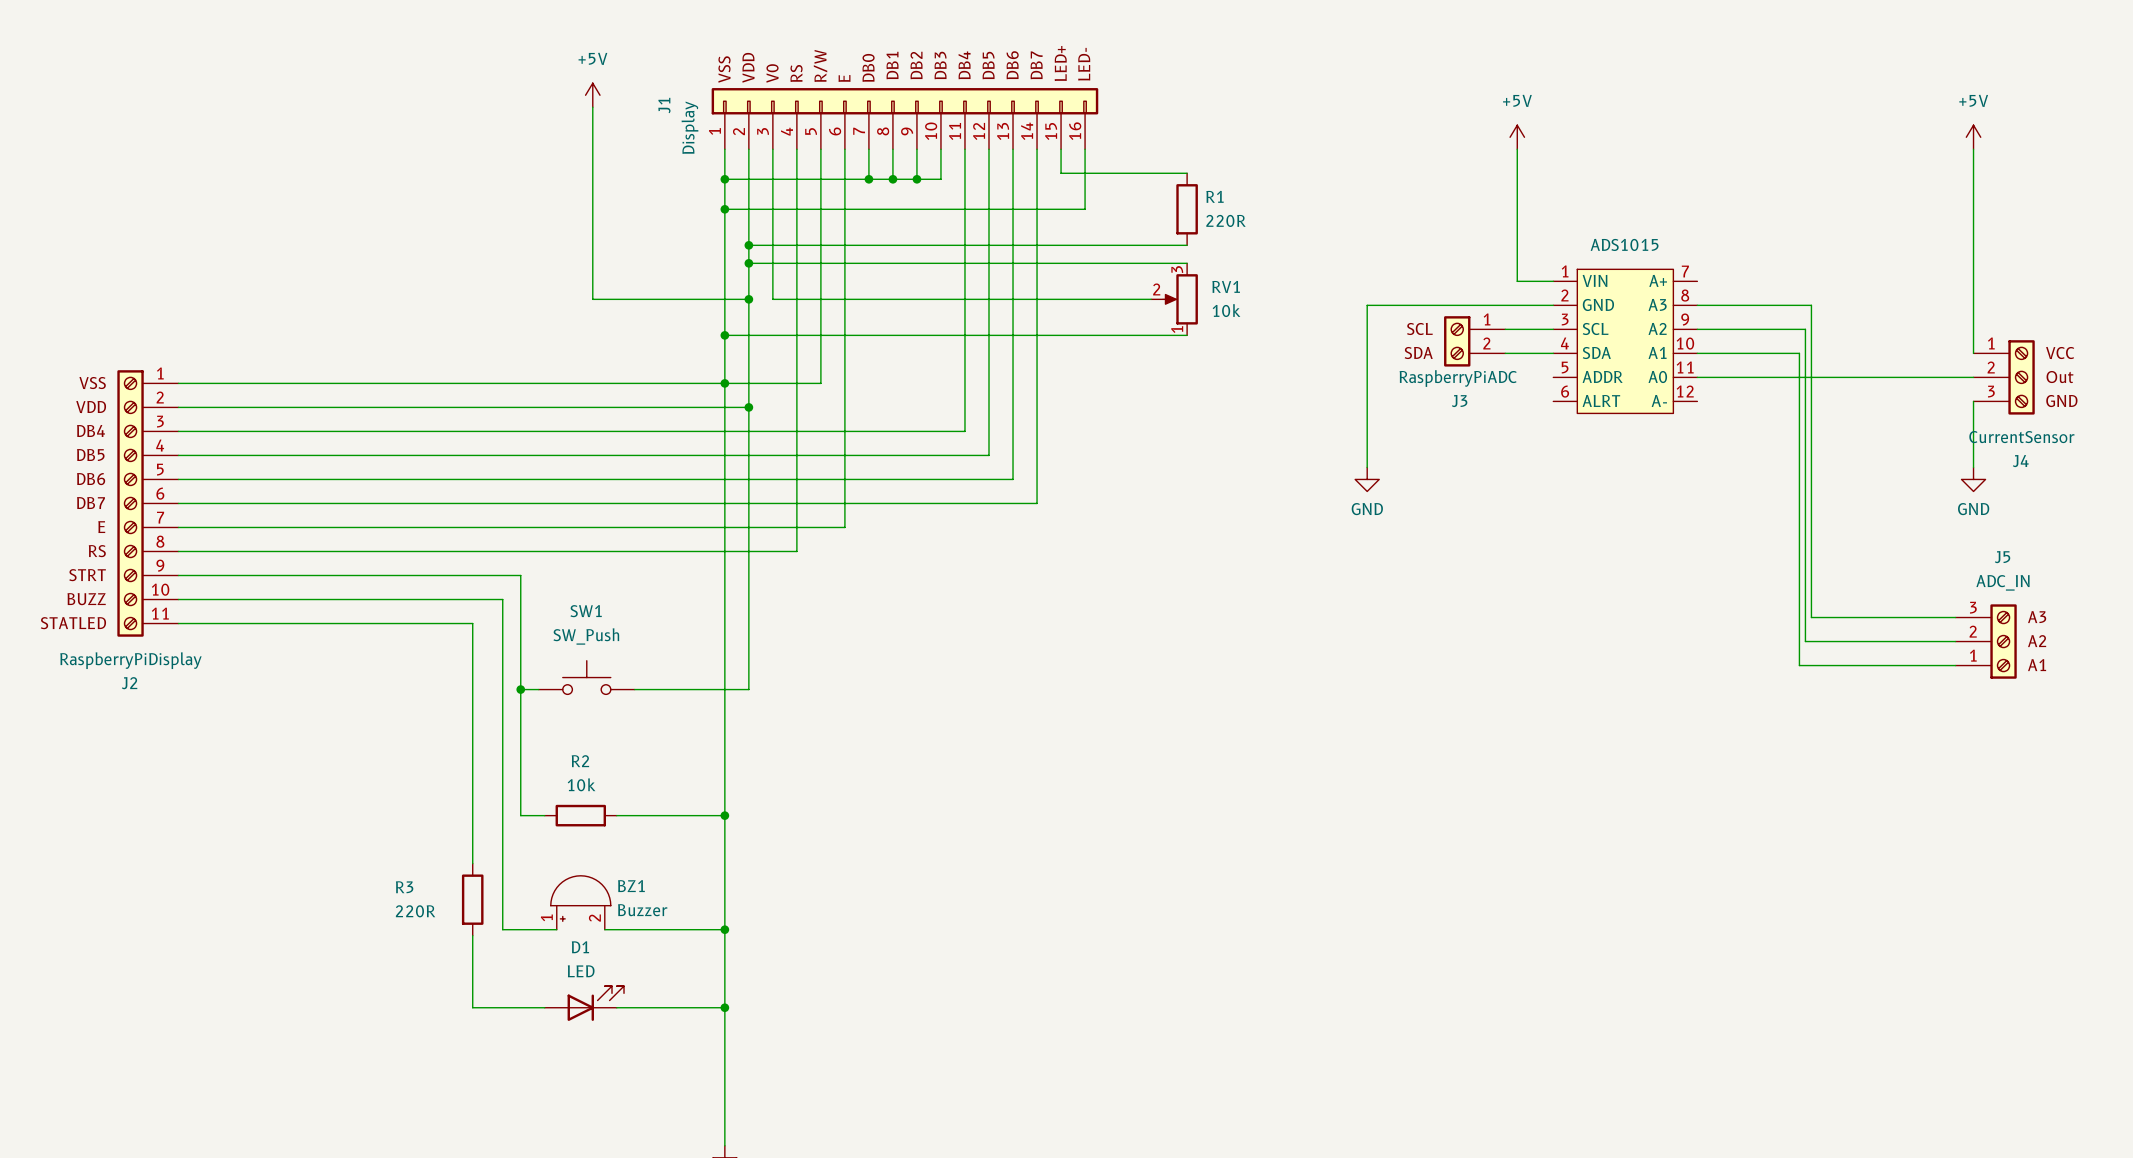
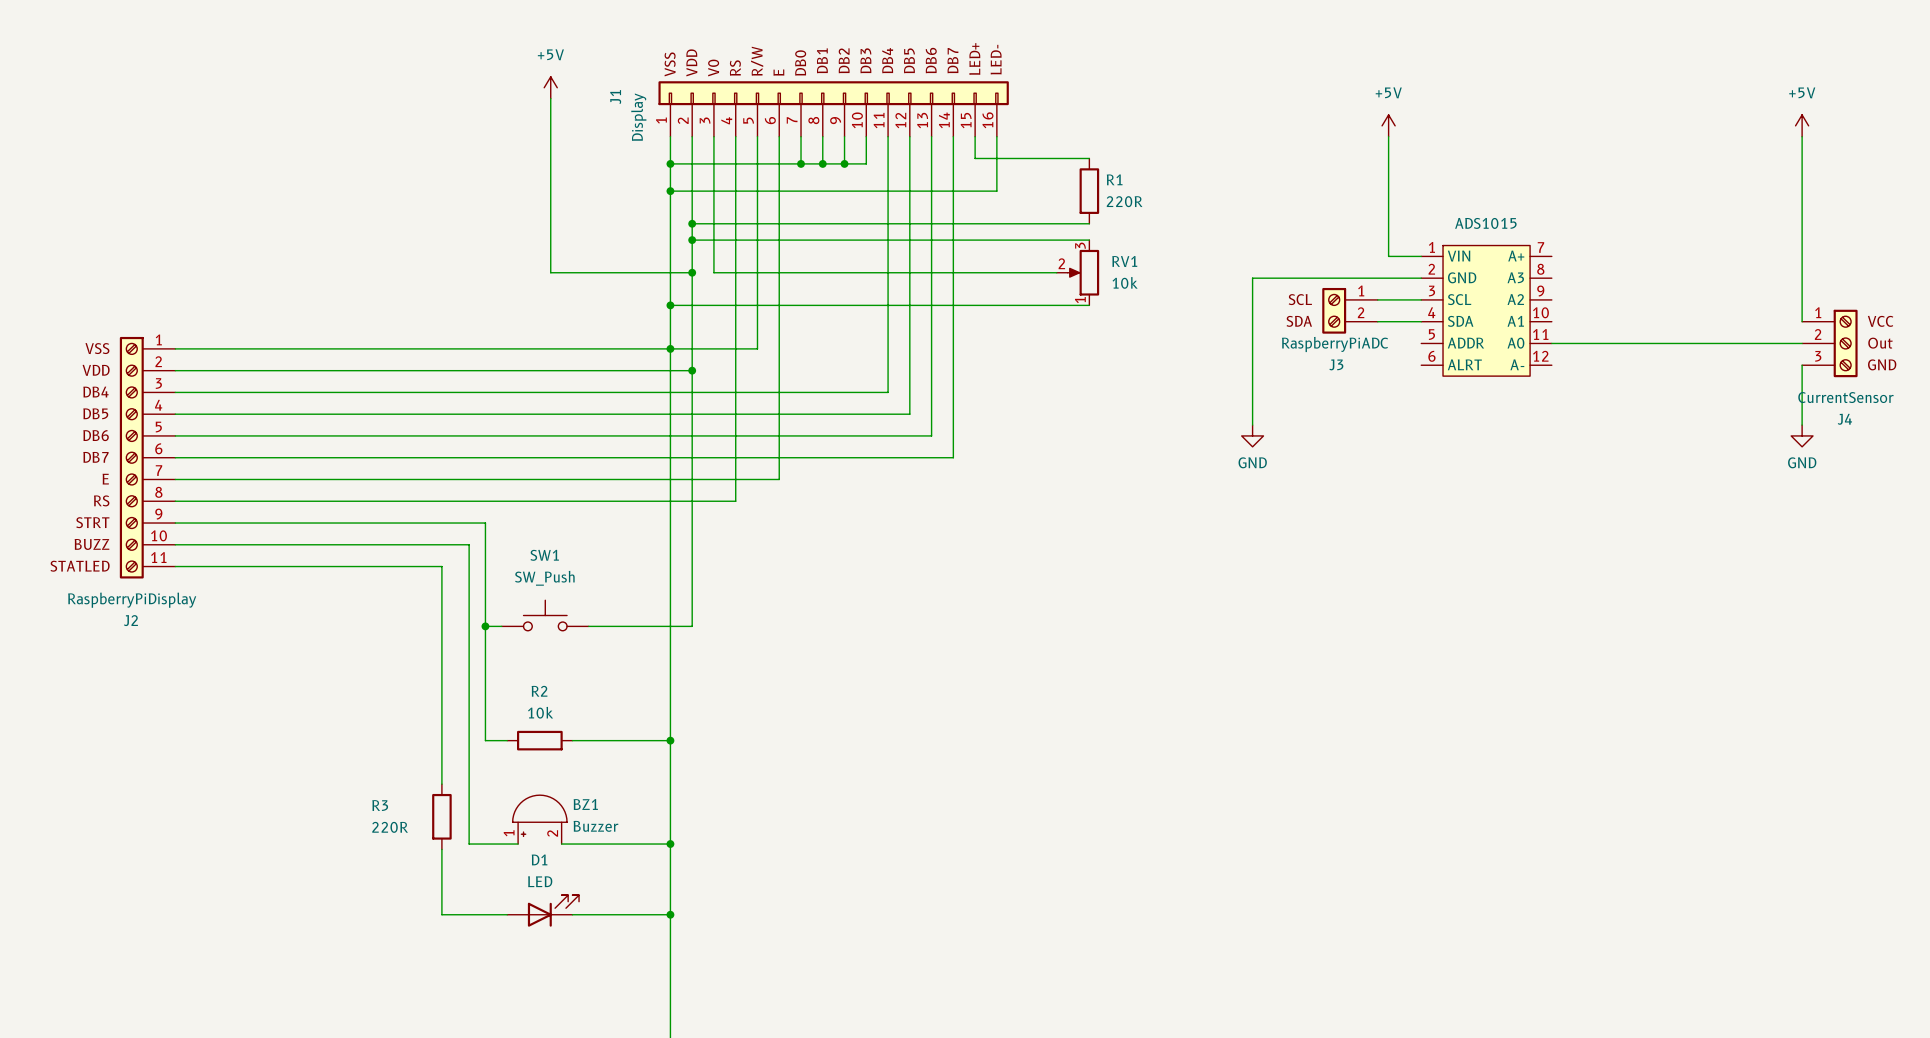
wire: (1697, 305) (1811, 305) (1811, 617) (1955, 617) -> none
wire: (1697, 329) (1805, 329) (1805, 641) (1955, 641) -> none
wire: (1697, 353) (1799, 353) (1799, 665) (1955, 665) -> none
J5: ADC_IN (1986, 641) -> none

